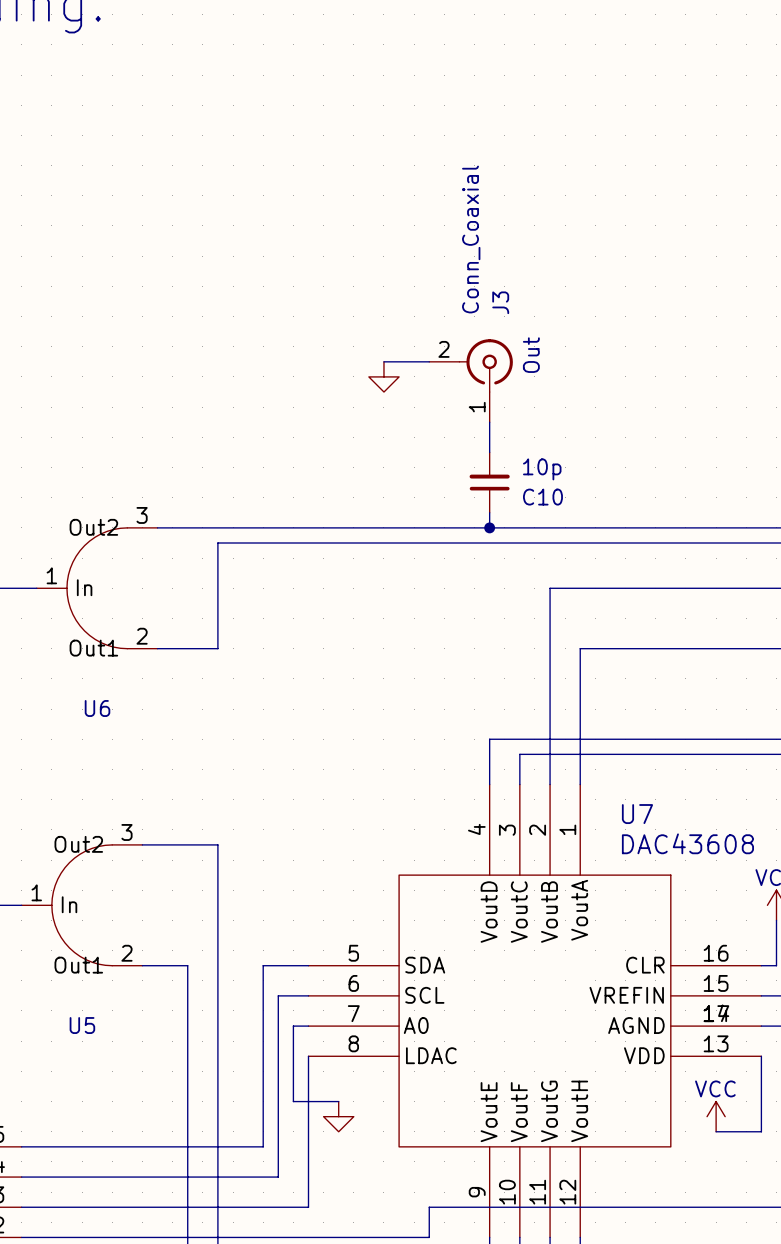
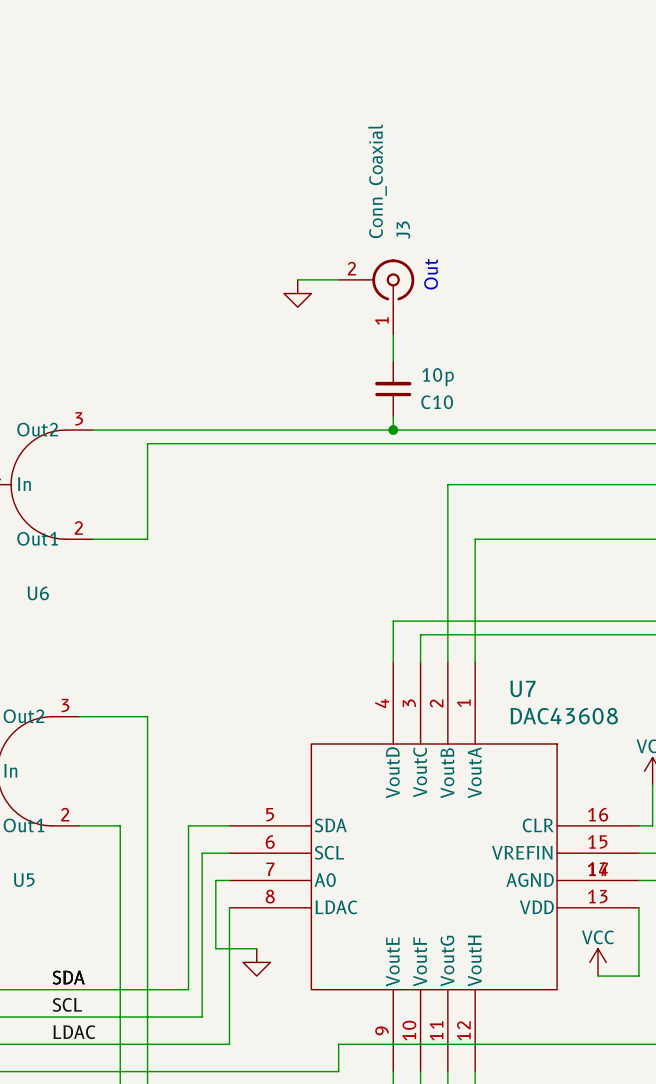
label: none -> SDA (68, 977)
label: none -> SCL (67, 1004)
label: none -> LDAC (74, 1032)

